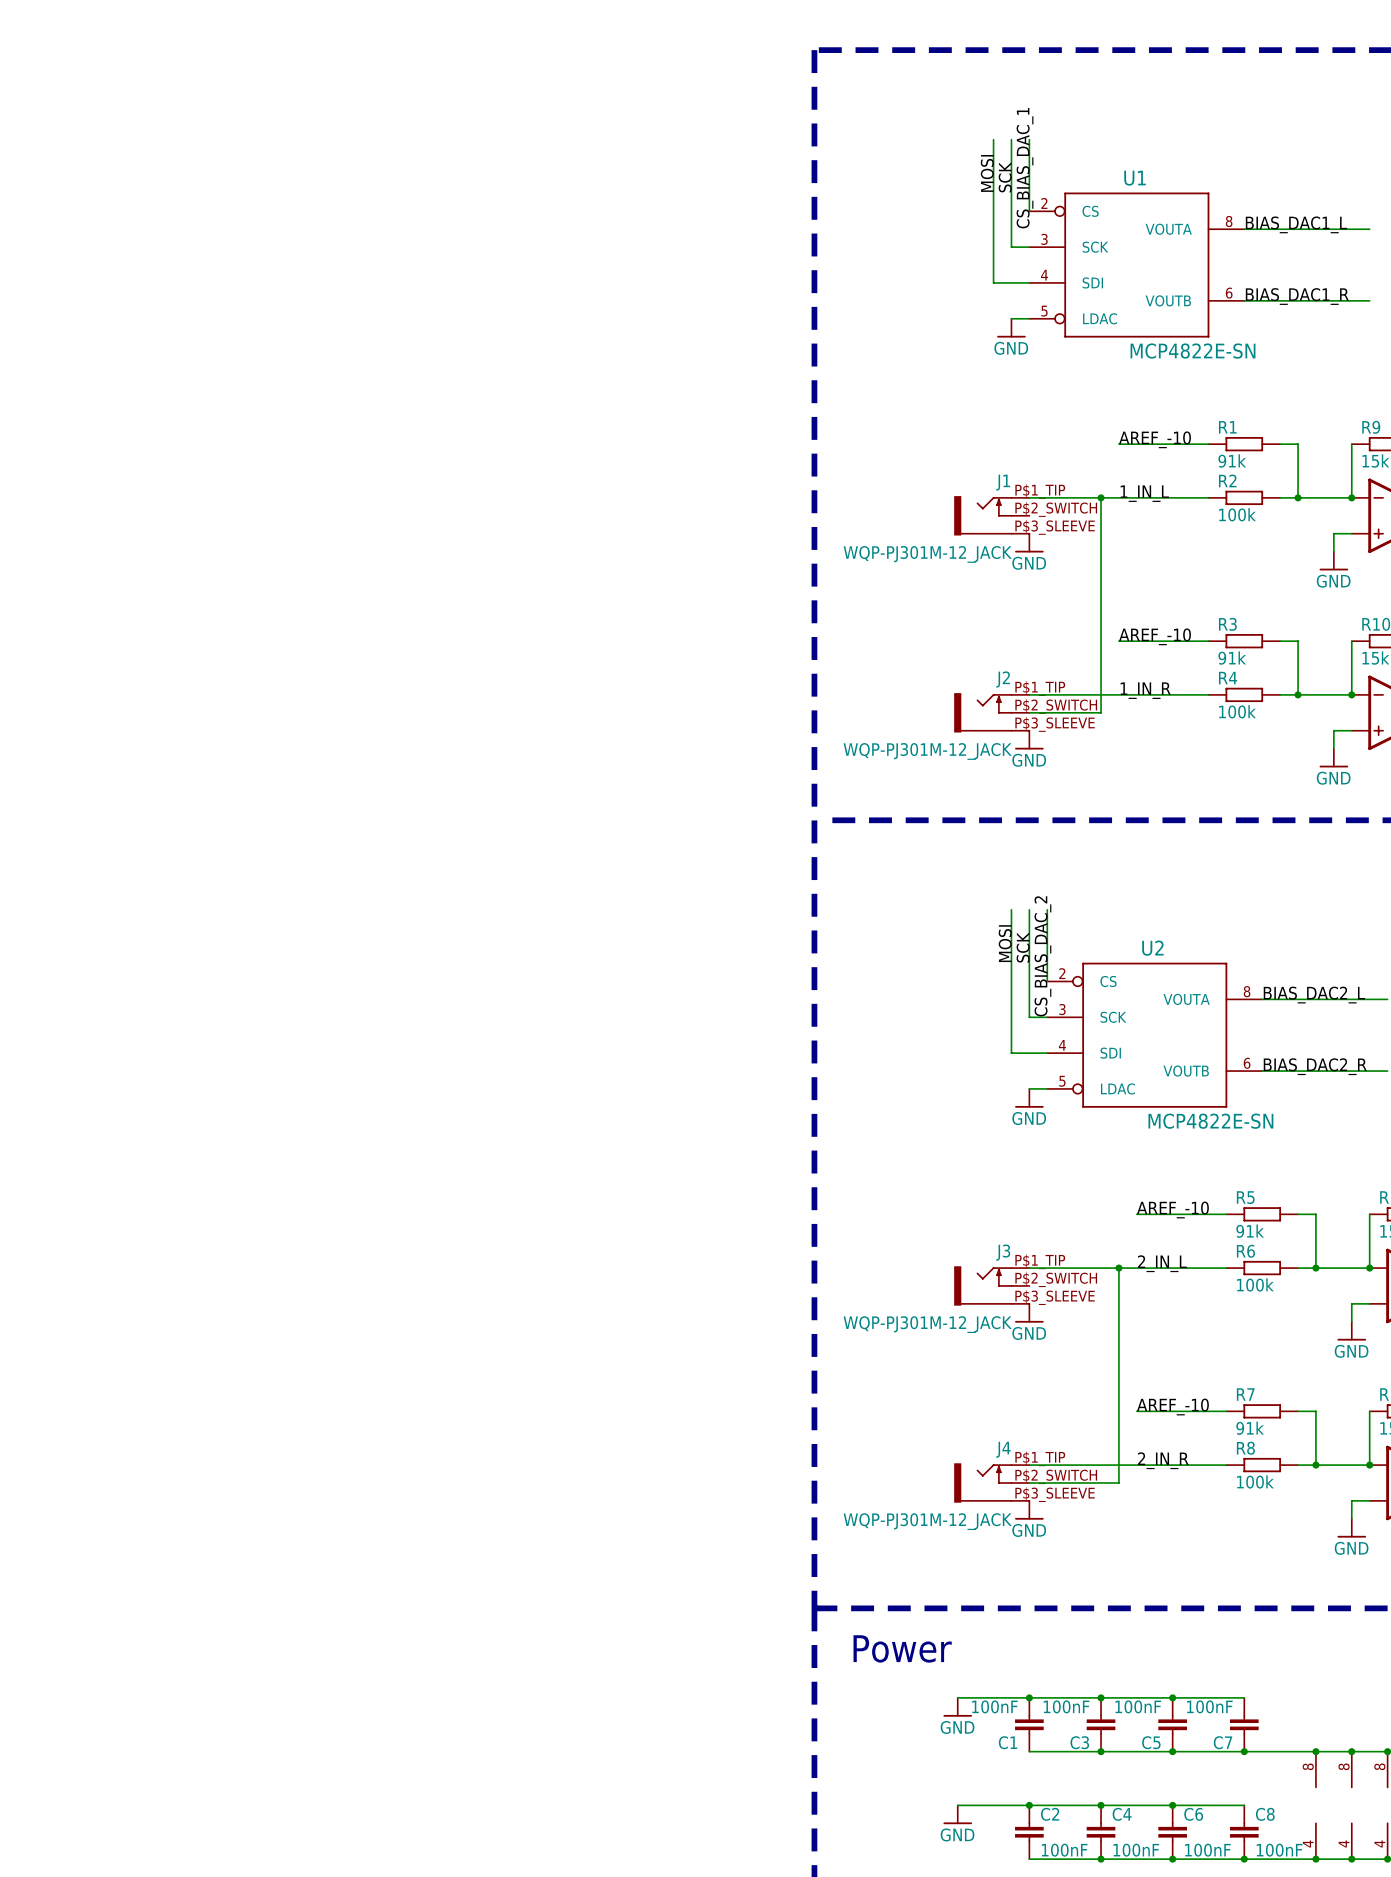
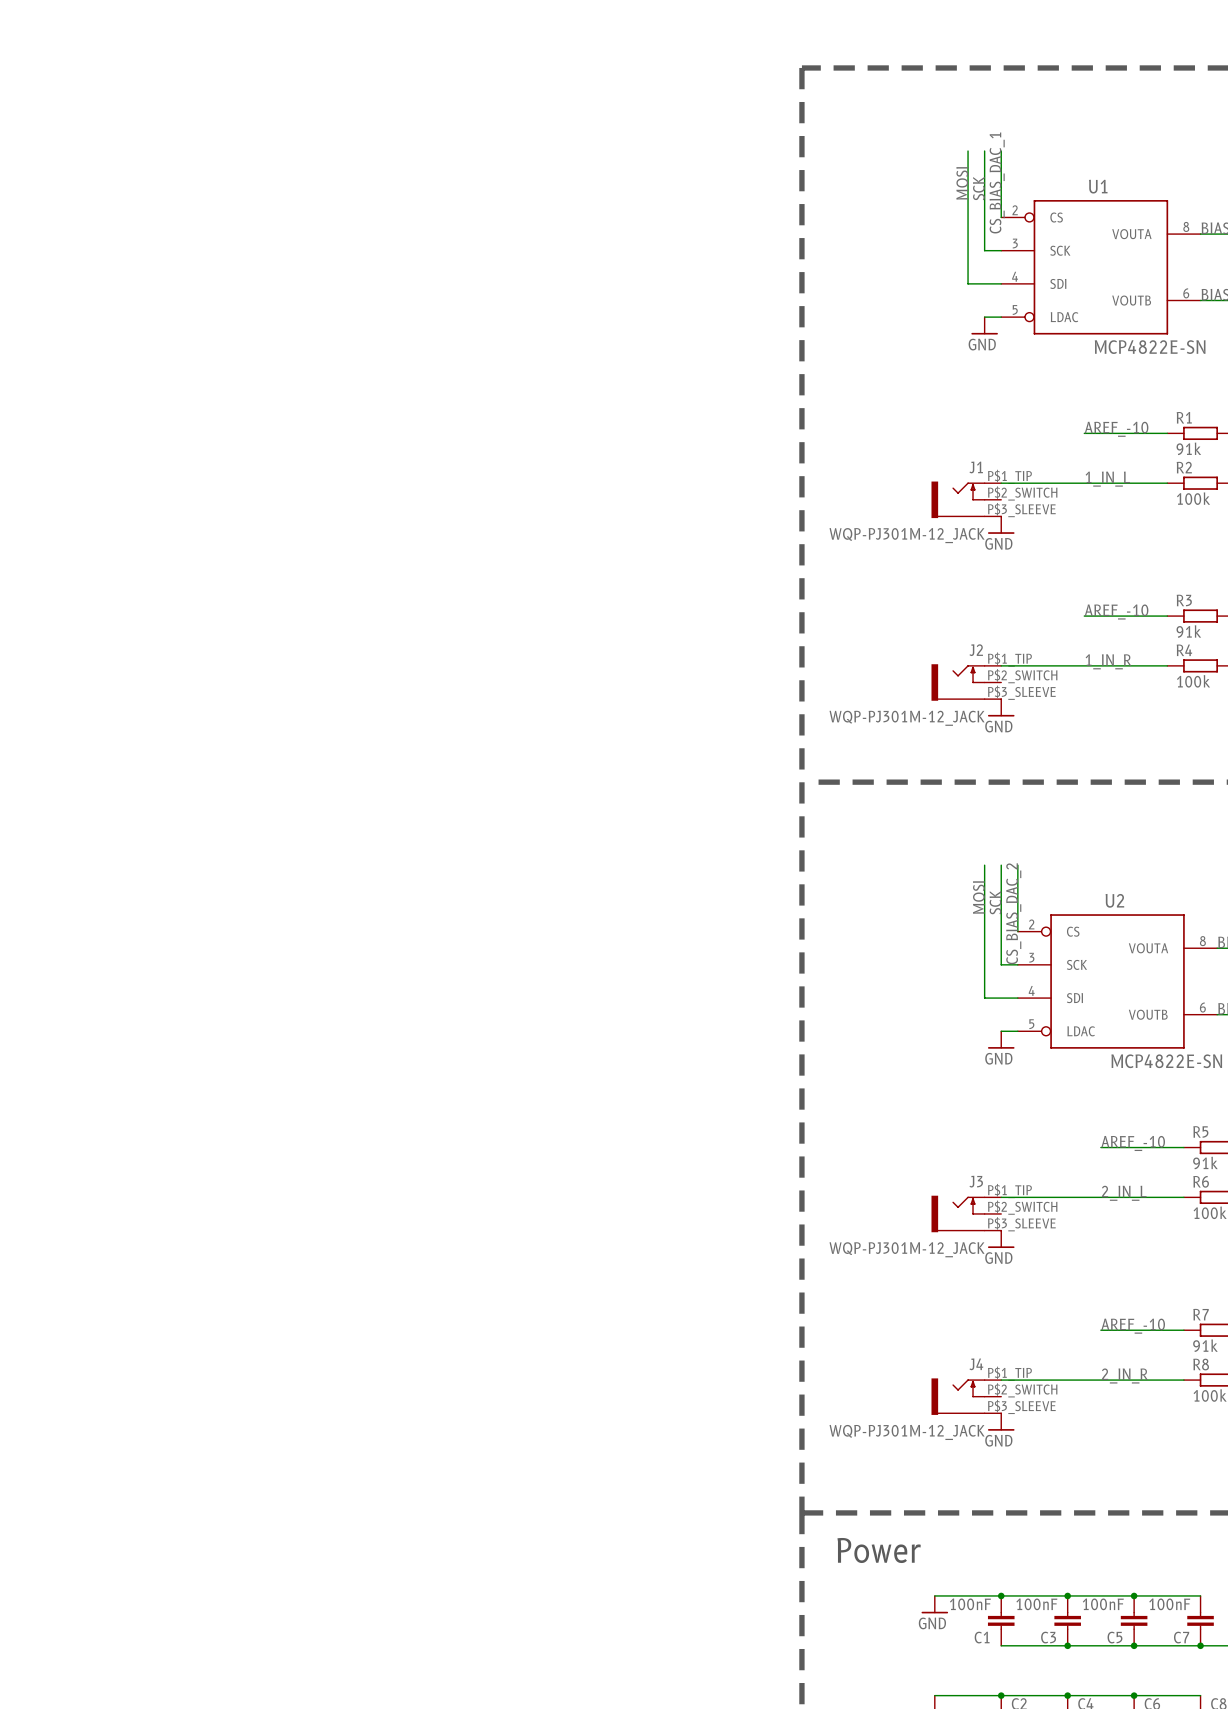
wire: (1101, 497) (1101, 712) (1029, 712) -> none
junction: (1101, 497) -> none
wire: (1118, 1268) (1118, 1482) (1029, 1482) -> none
junction: (1118, 1268) -> none

